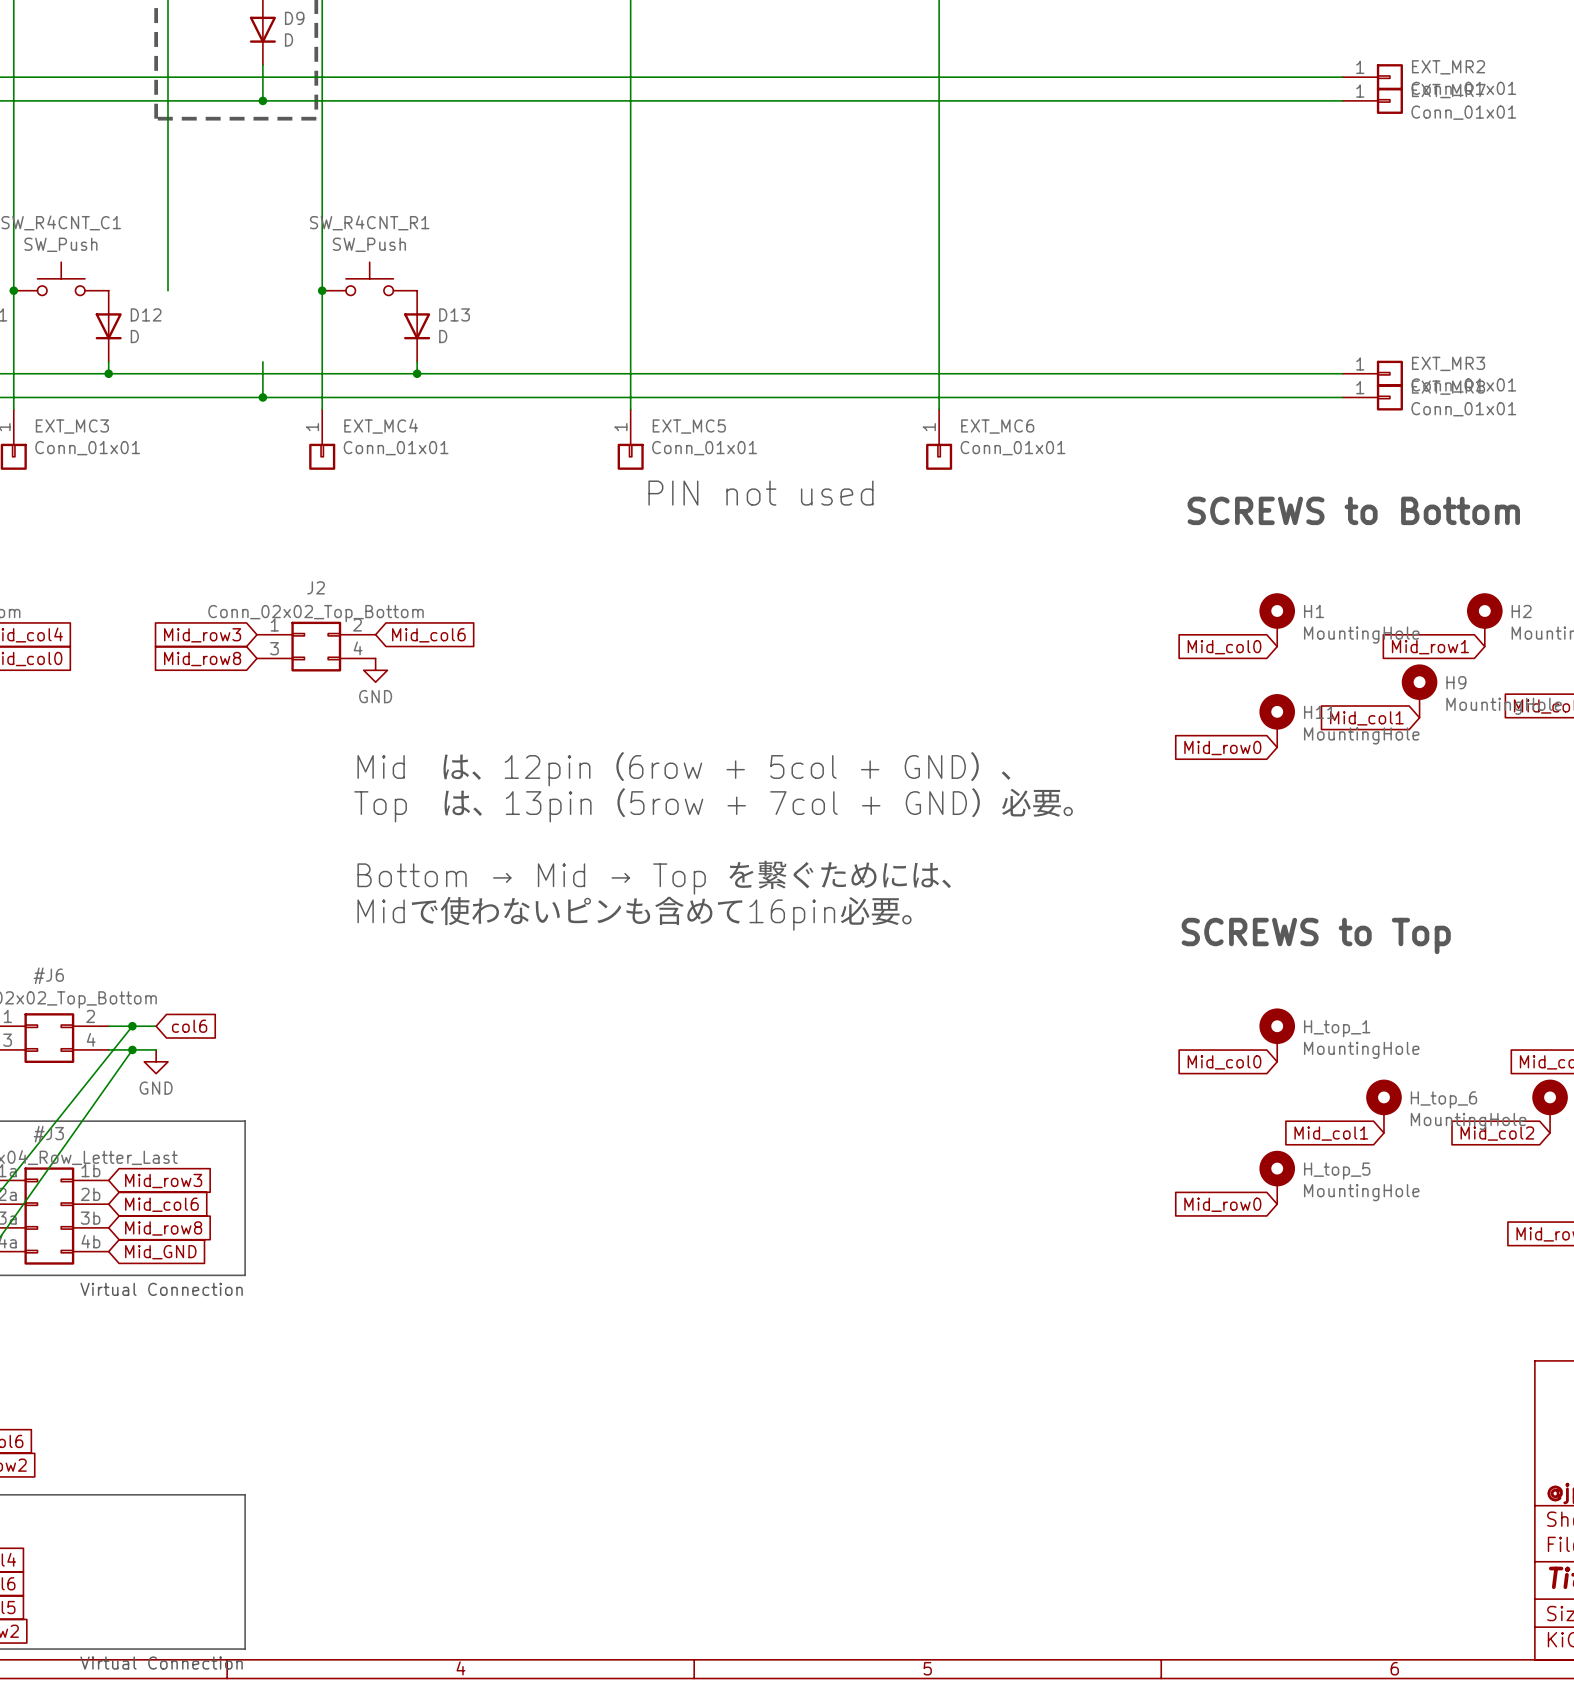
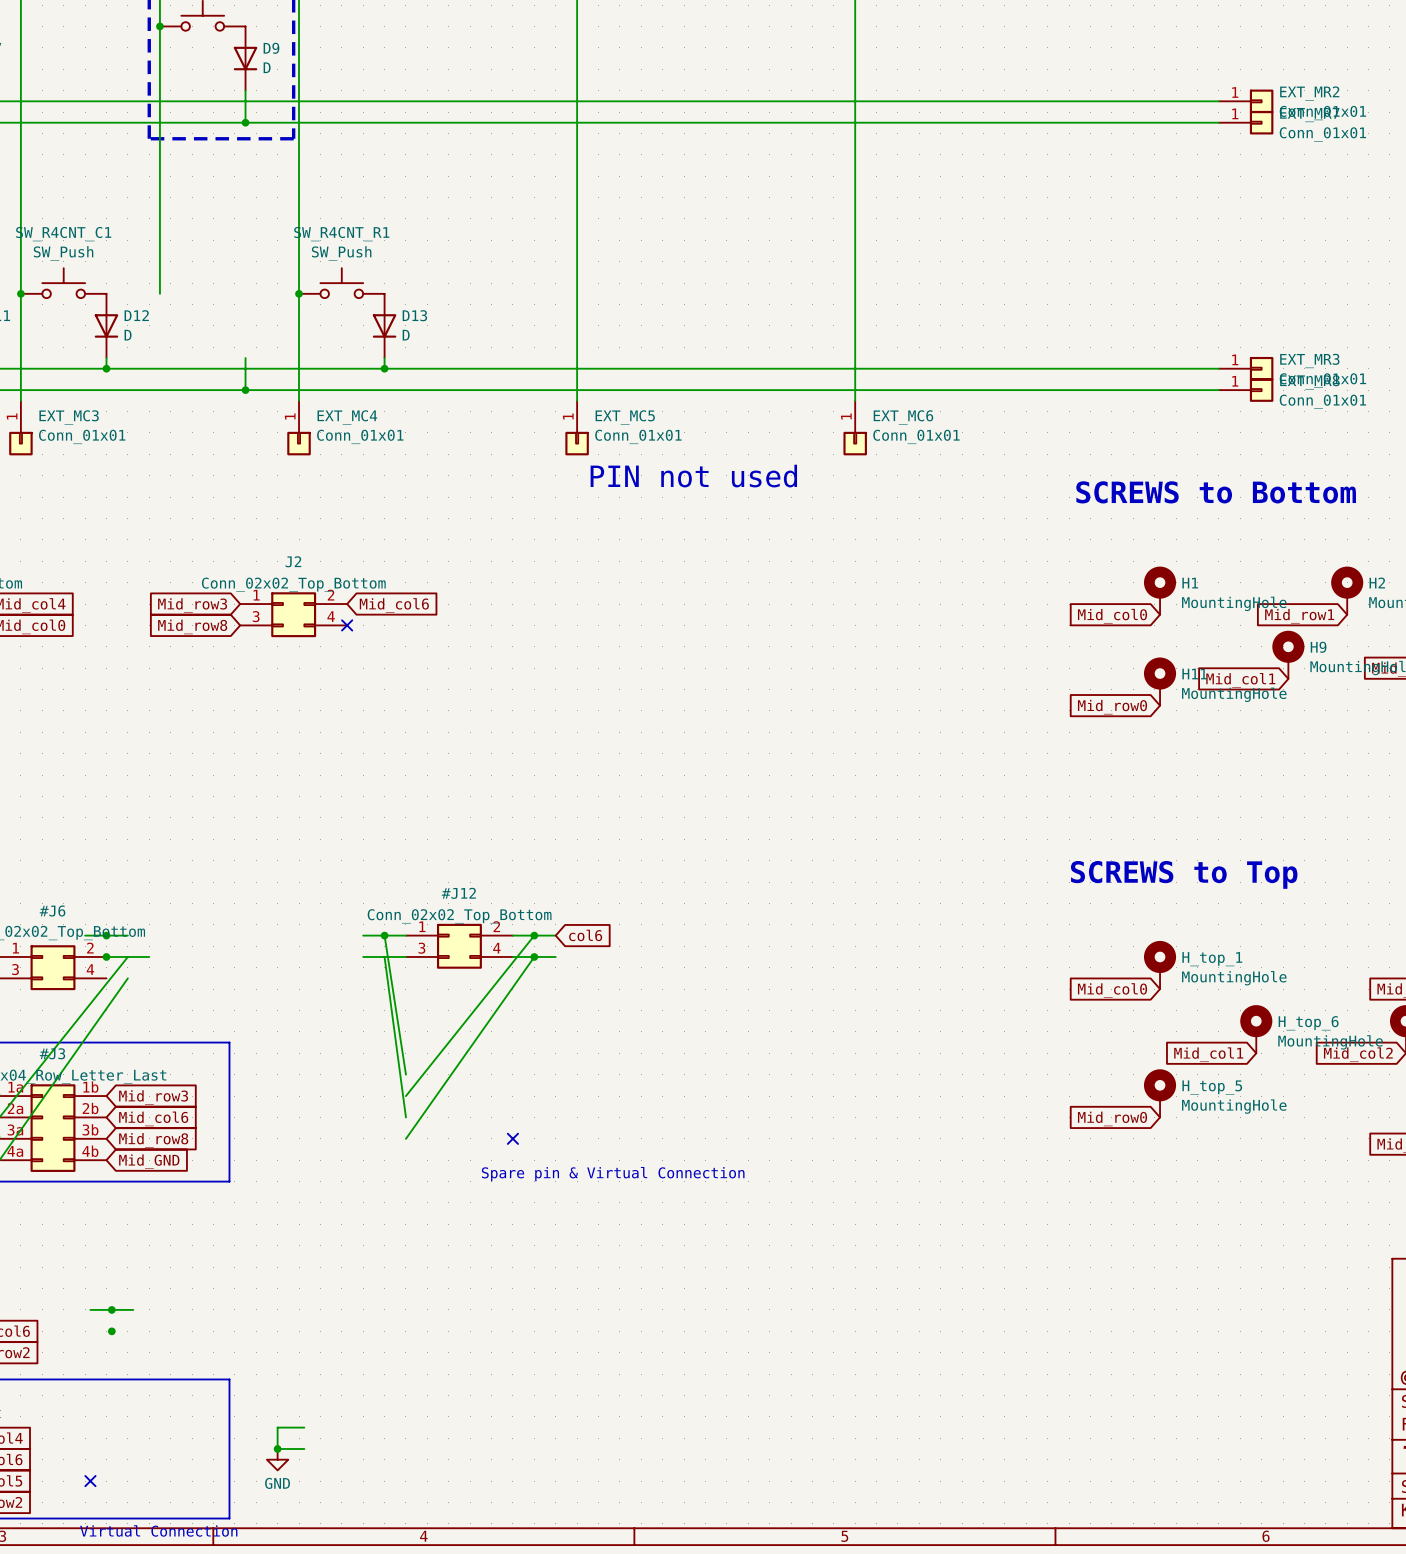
no-connect mark: none -> (347, 625)
power symbol: GND (375, 670) -> none
text: Mid は、12pin（6row + 5col + GND）、 (684, 768) -> none
text: Top は、13pin（5row + 7col + GND）必要。 (713, 804) -> none
text: Bottom → Mid → Top を繋ぐためには、 (654, 877) -> none
text: Midで使わないピンも含めて16pin必要。 (634, 913) -> none
junction: none -> (106, 935)
wire: none -> (363, 935) (405, 935)
wire: none -> (384, 935) (405, 1074)
junction: none -> (384, 935)
wire: none -> (512, 935) (555, 935)
wire: none -> (534, 935) (405, 1096)
junction: none -> (534, 935)
global label: none -> col6 (585, 935)
#J12: none -> Conn_02x02_Top_Bottom (459, 946)
junction: none -> (106, 956)
junction: (132, 1026) -> none
global label: col6 (189, 1026) -> none
wire: none -> (363, 956) (405, 956)
wire: none -> (384, 956) (405, 1117)
wire: none -> (512, 956) (555, 956)
wire: none -> (534, 956) (405, 1138)
junction: none -> (534, 956)
wire: (108, 1049) (156, 1049) -> (85, 935) (127, 935)
junction: (132, 1049) -> none
power symbol: GND (156, 1061) -> none
no-connect mark: none -> (512, 1138)
text: none -> Spare pin & Virtual Connection (613, 1174)
text: Virtual Connection (161, 1289) -> none
wire: none -> (90, 1309) (133, 1309)
junction: none -> (111, 1309)
junction: none -> (111, 1331)
wire: none -> (304, 1427) (277, 1427) (277, 1448) (304, 1448)
junction: none -> (277, 1448)
power symbol: none -> GND (277, 1459)
no-connect mark: none -> (90, 1481)

